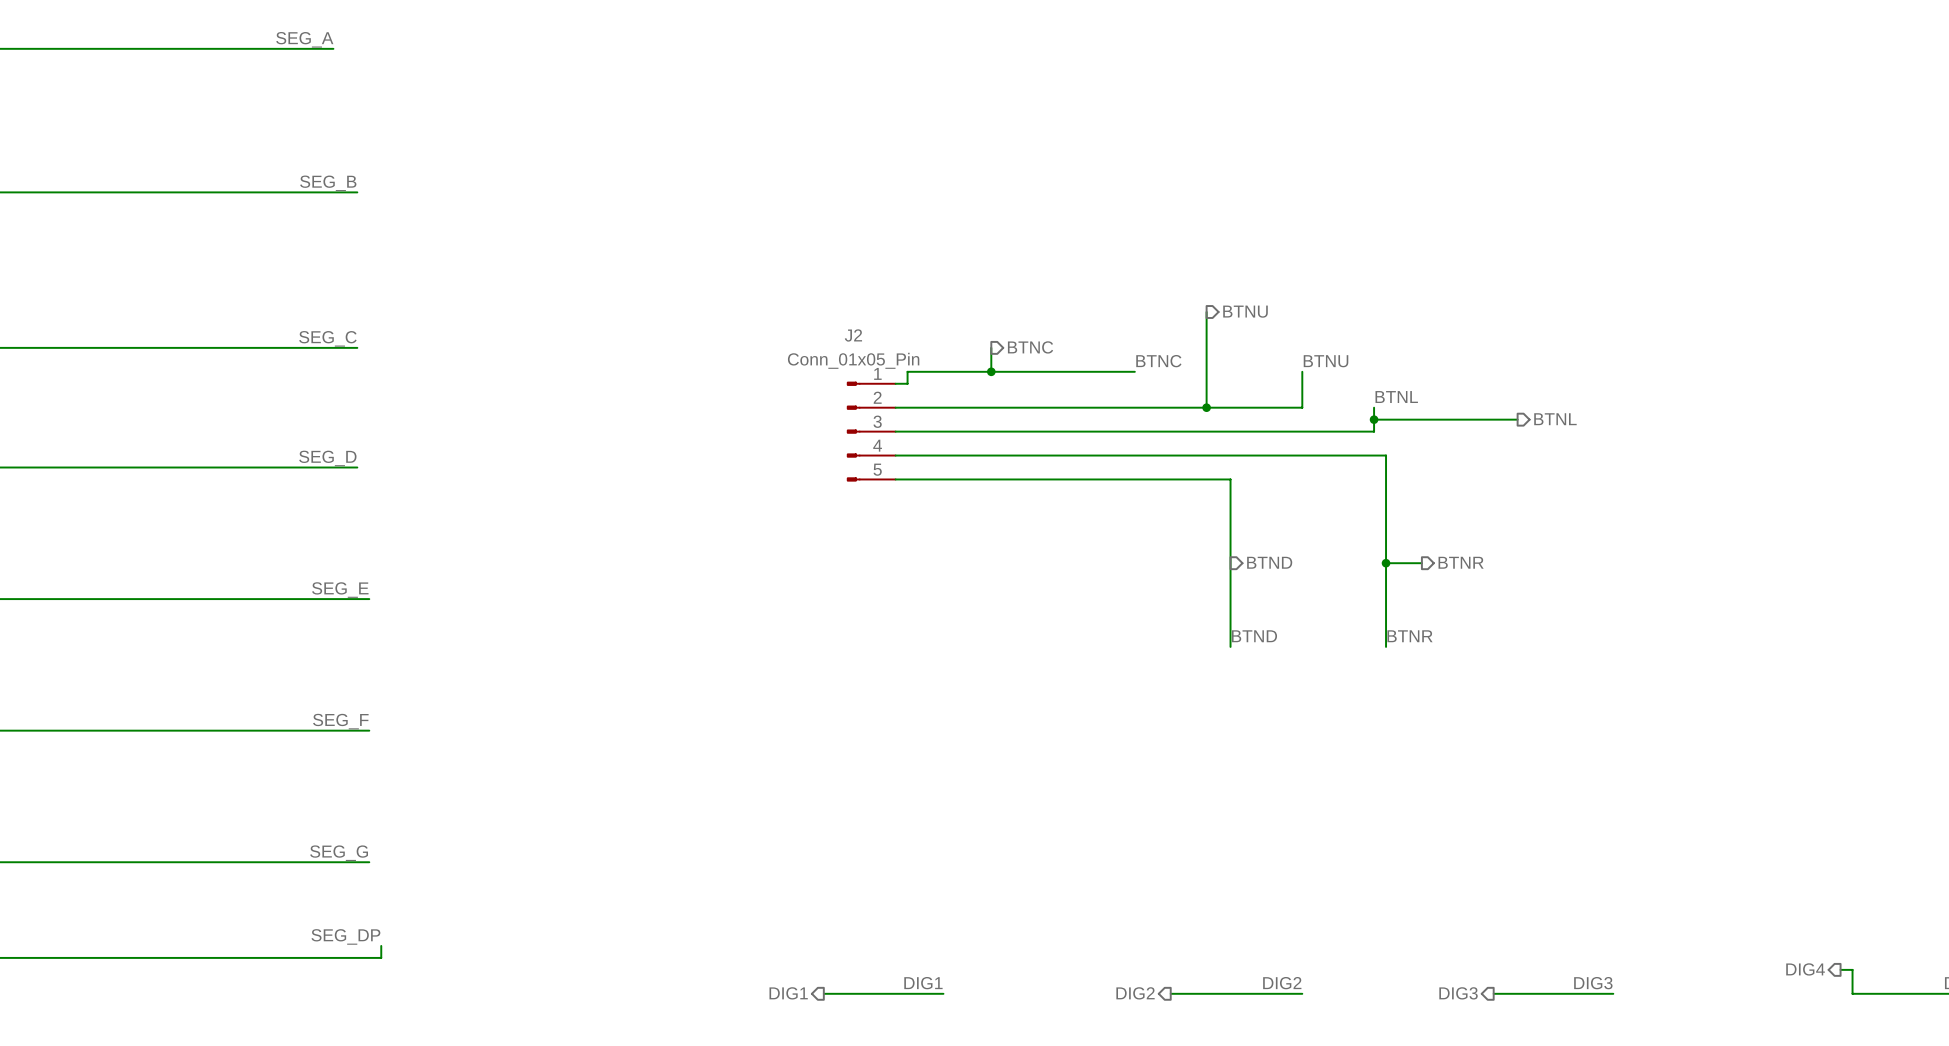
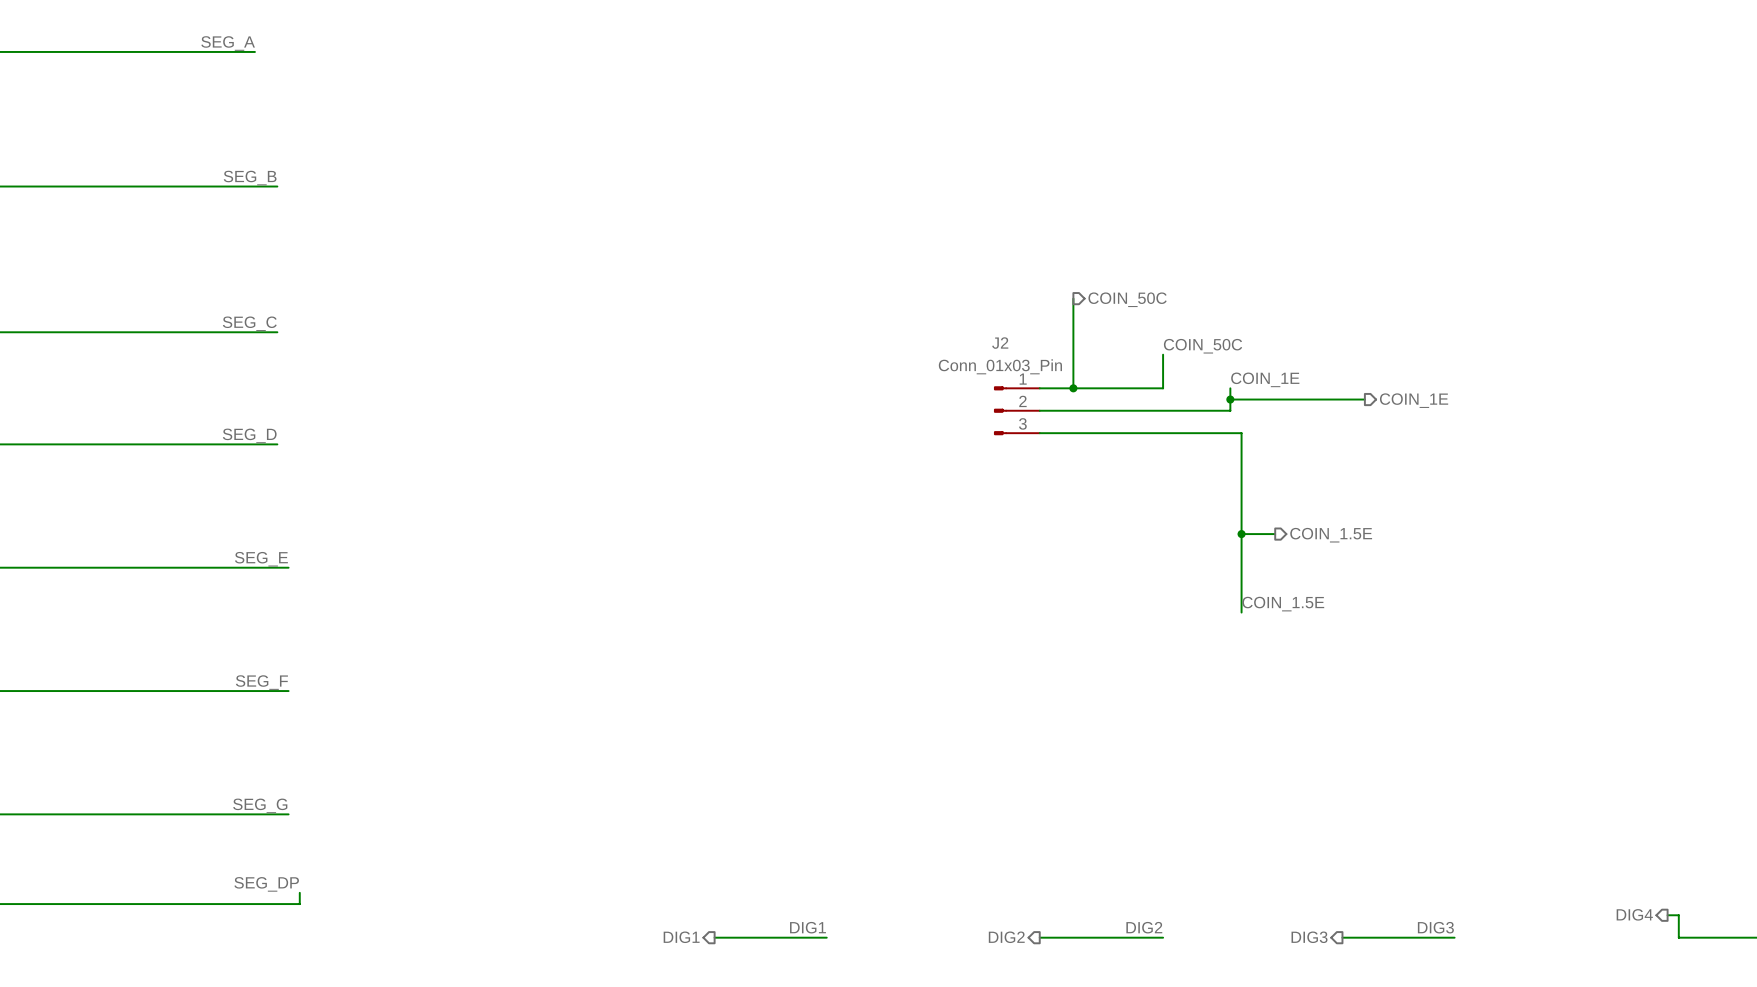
hierarchical label: BTNU (1245, 311) -> COIN_50C (1127, 299)
J2 name position: J2 (853, 335) -> J2 (1000, 343)
wire: (991, 347) (991, 371) -> none
hierarchical label: BTNC (1030, 347) -> none
J2 value: Conn_01x05_Pin (853, 360) -> Conn_01x03_Pin (1000, 366)
label: BTNC (1158, 361) -> none
label: BTNU (1326, 361) -> COIN_50C (1203, 346)
junction: (991, 371) -> none
wire: (1134, 371) (907, 371) (907, 383) (895, 383) -> none
J2 symbol: [847, 381, 896, 482] -> [994, 386, 1040, 435]
label: BTNL (1396, 397) -> COIN_1E (1265, 379)
wire: (895, 407) (1170, 407) -> none
hierarchical label: BTNL (1555, 419) -> COIN_1E (1414, 400)
wire: (895, 431) (1170, 431) -> none
wire: (895, 455) (1170, 455) -> none
wire: (895, 479) (1230, 479) (1230, 646) -> none
hierarchical label: BTND (1269, 562) -> none
hierarchical label: BTNR (1461, 562) -> COIN_1.5E (1331, 535)
label: BTND (1254, 636) -> none
label: BTNR (1410, 636) -> COIN_1.5E (1283, 604)

